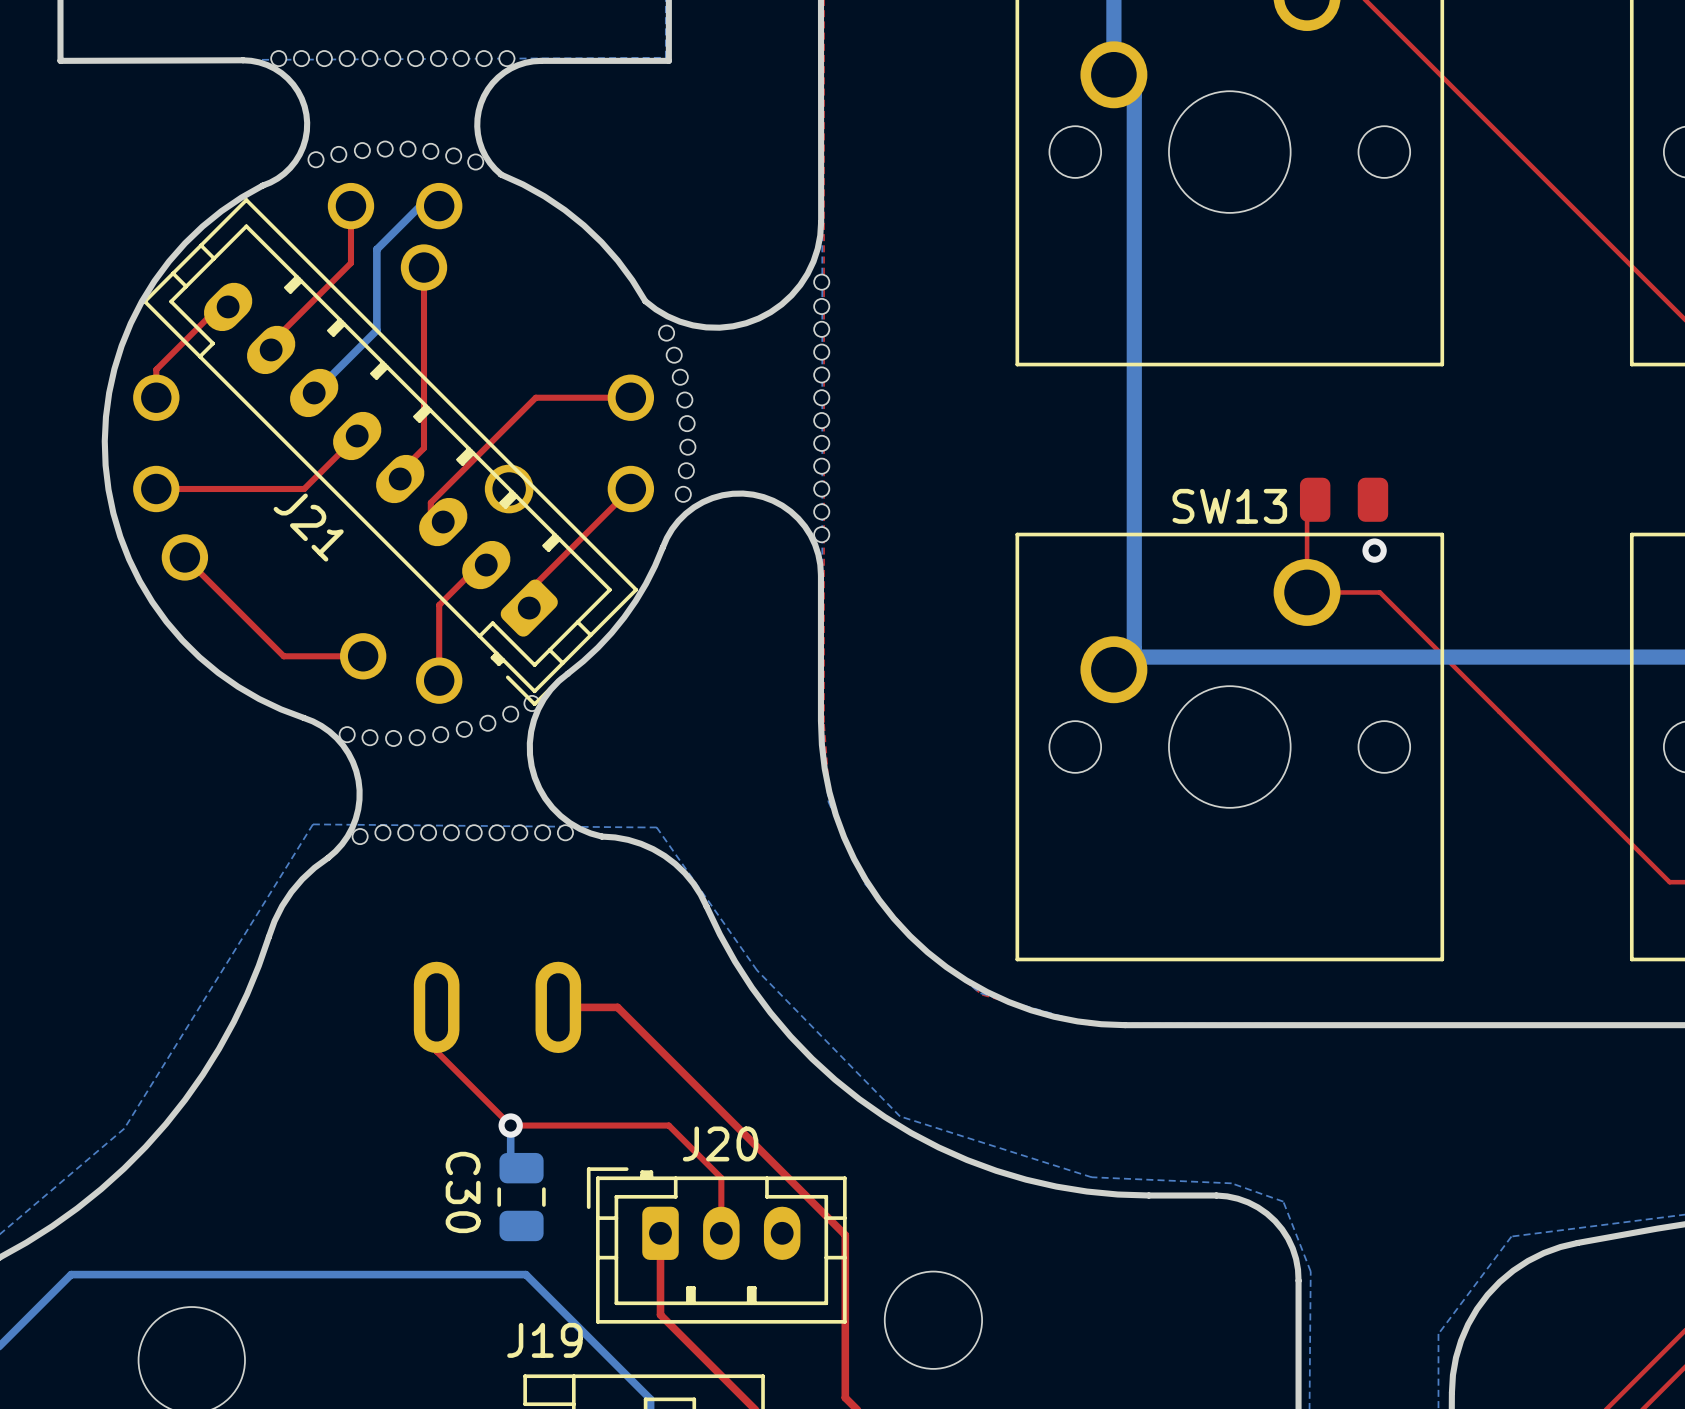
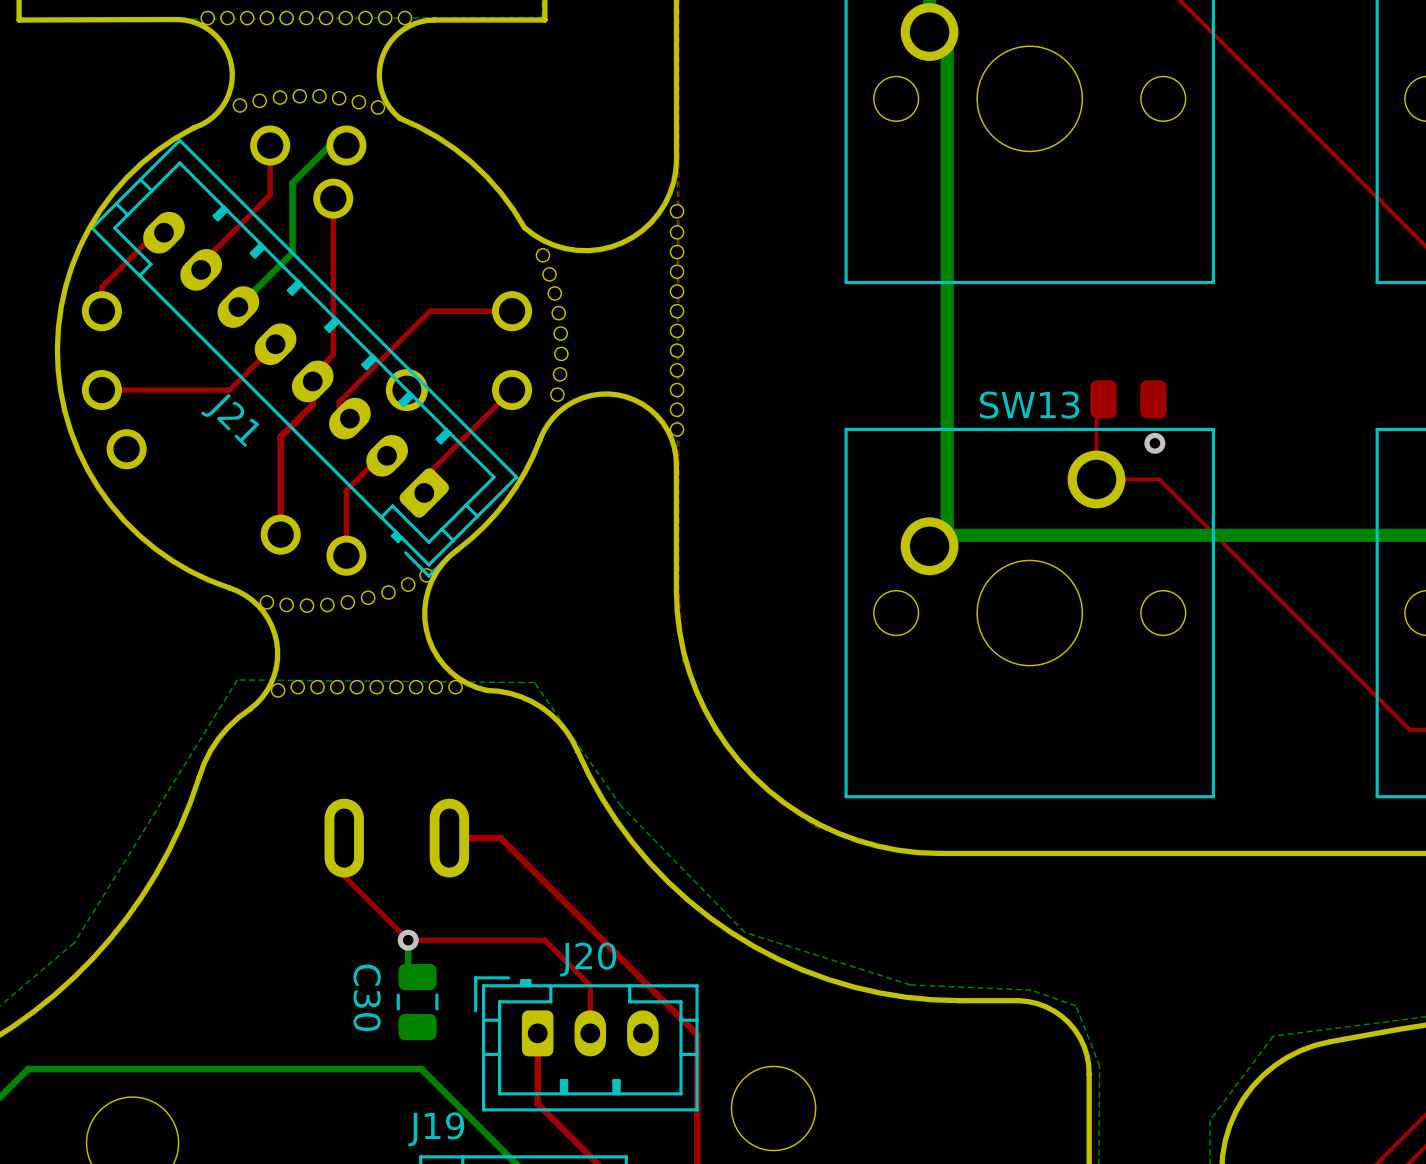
top track: (184, 557) (283, 656) (363, 656) -> (312, 381) (312, 404) (280, 436) (280, 534)

